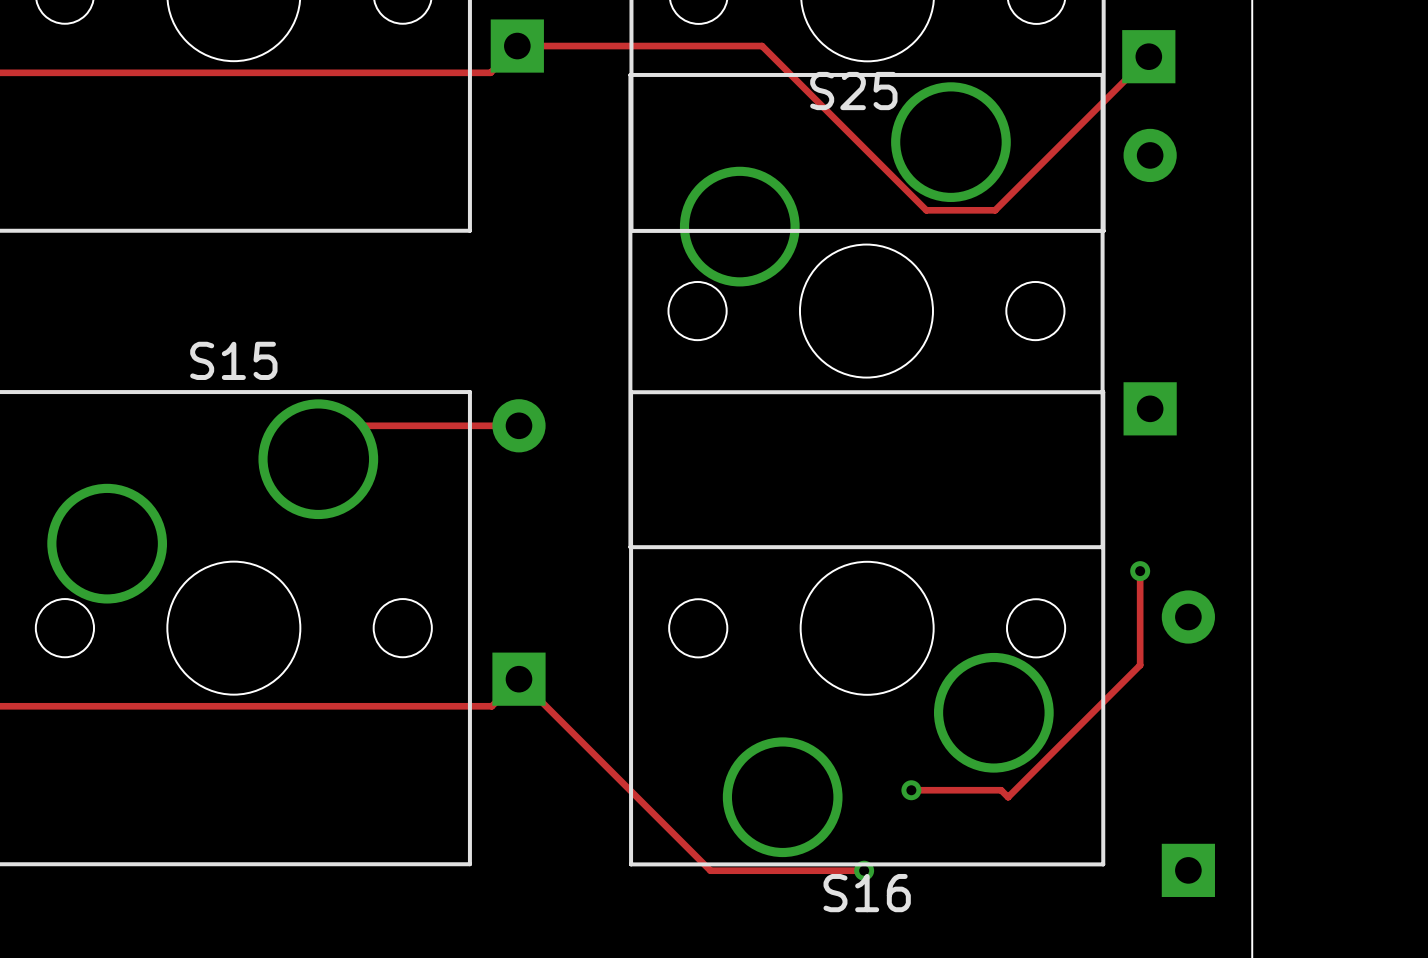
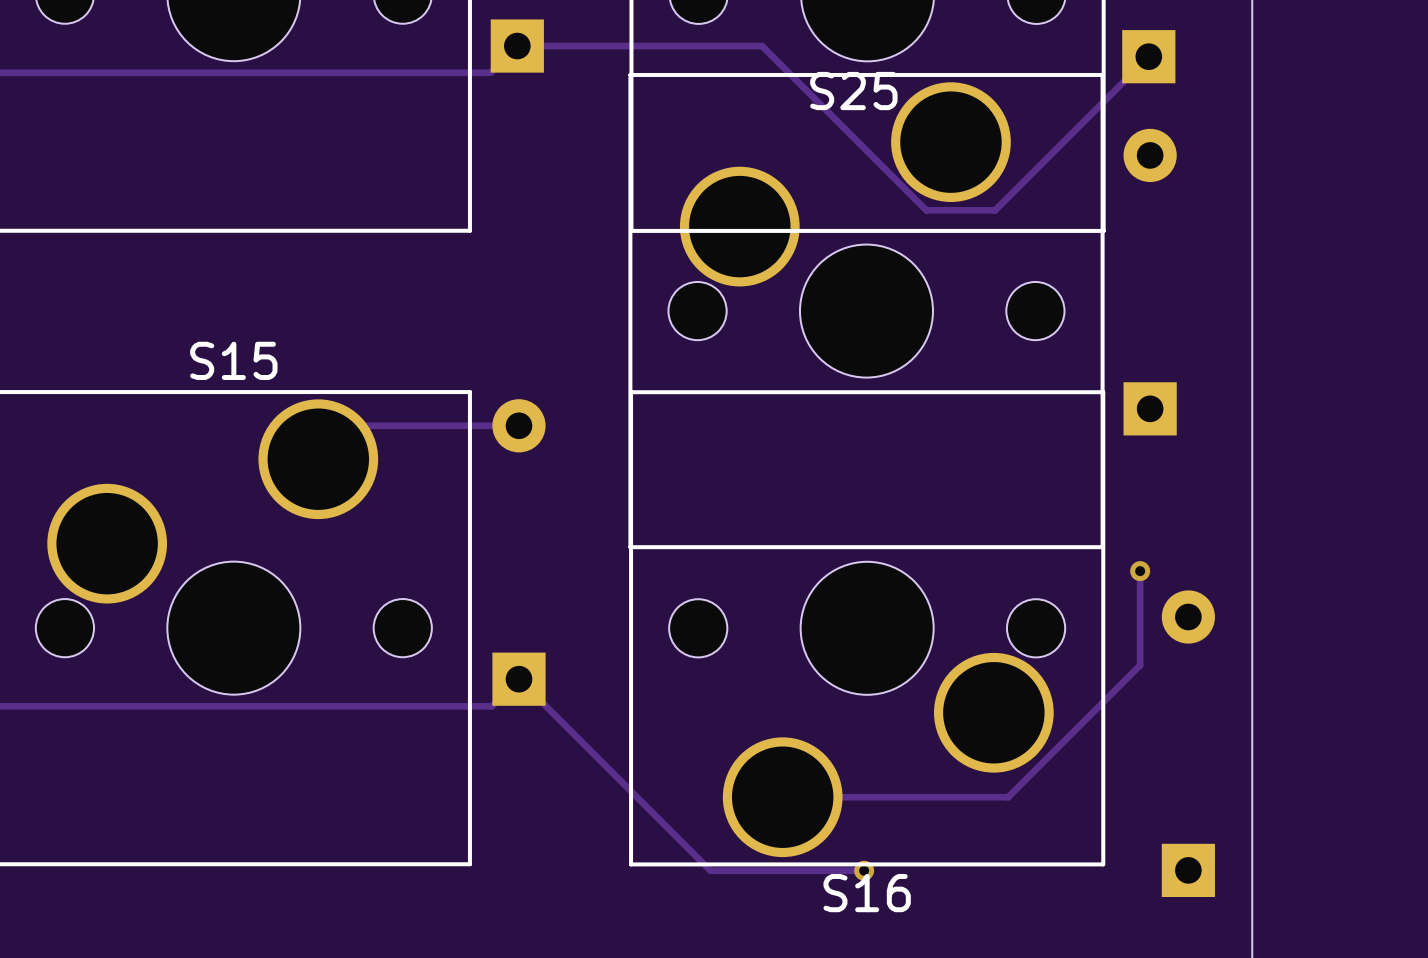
track: (911, 790) (1001, 790) (1008, 797) -> (782, 797) (1008, 797)
via: (911, 790) -> none

